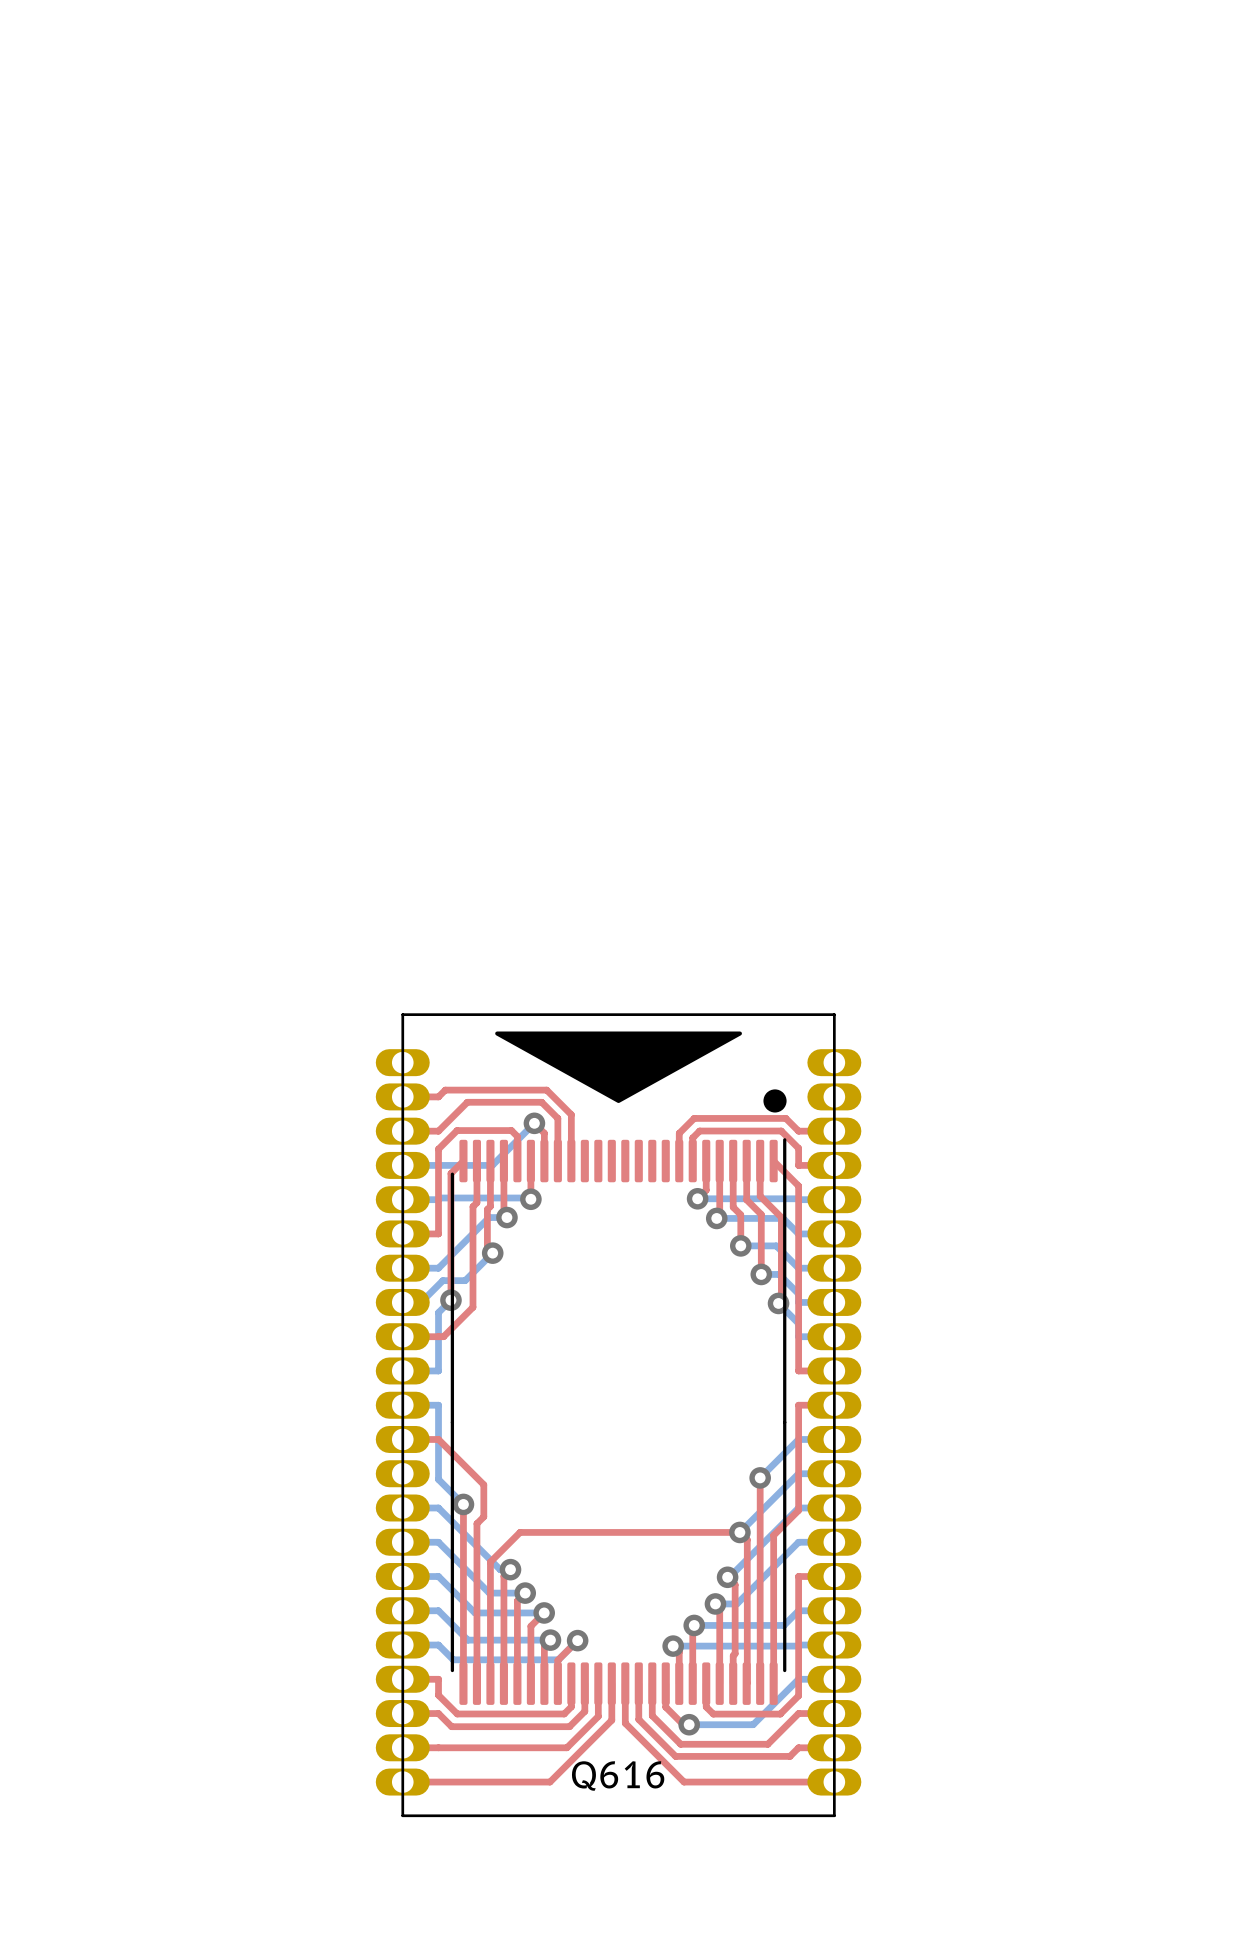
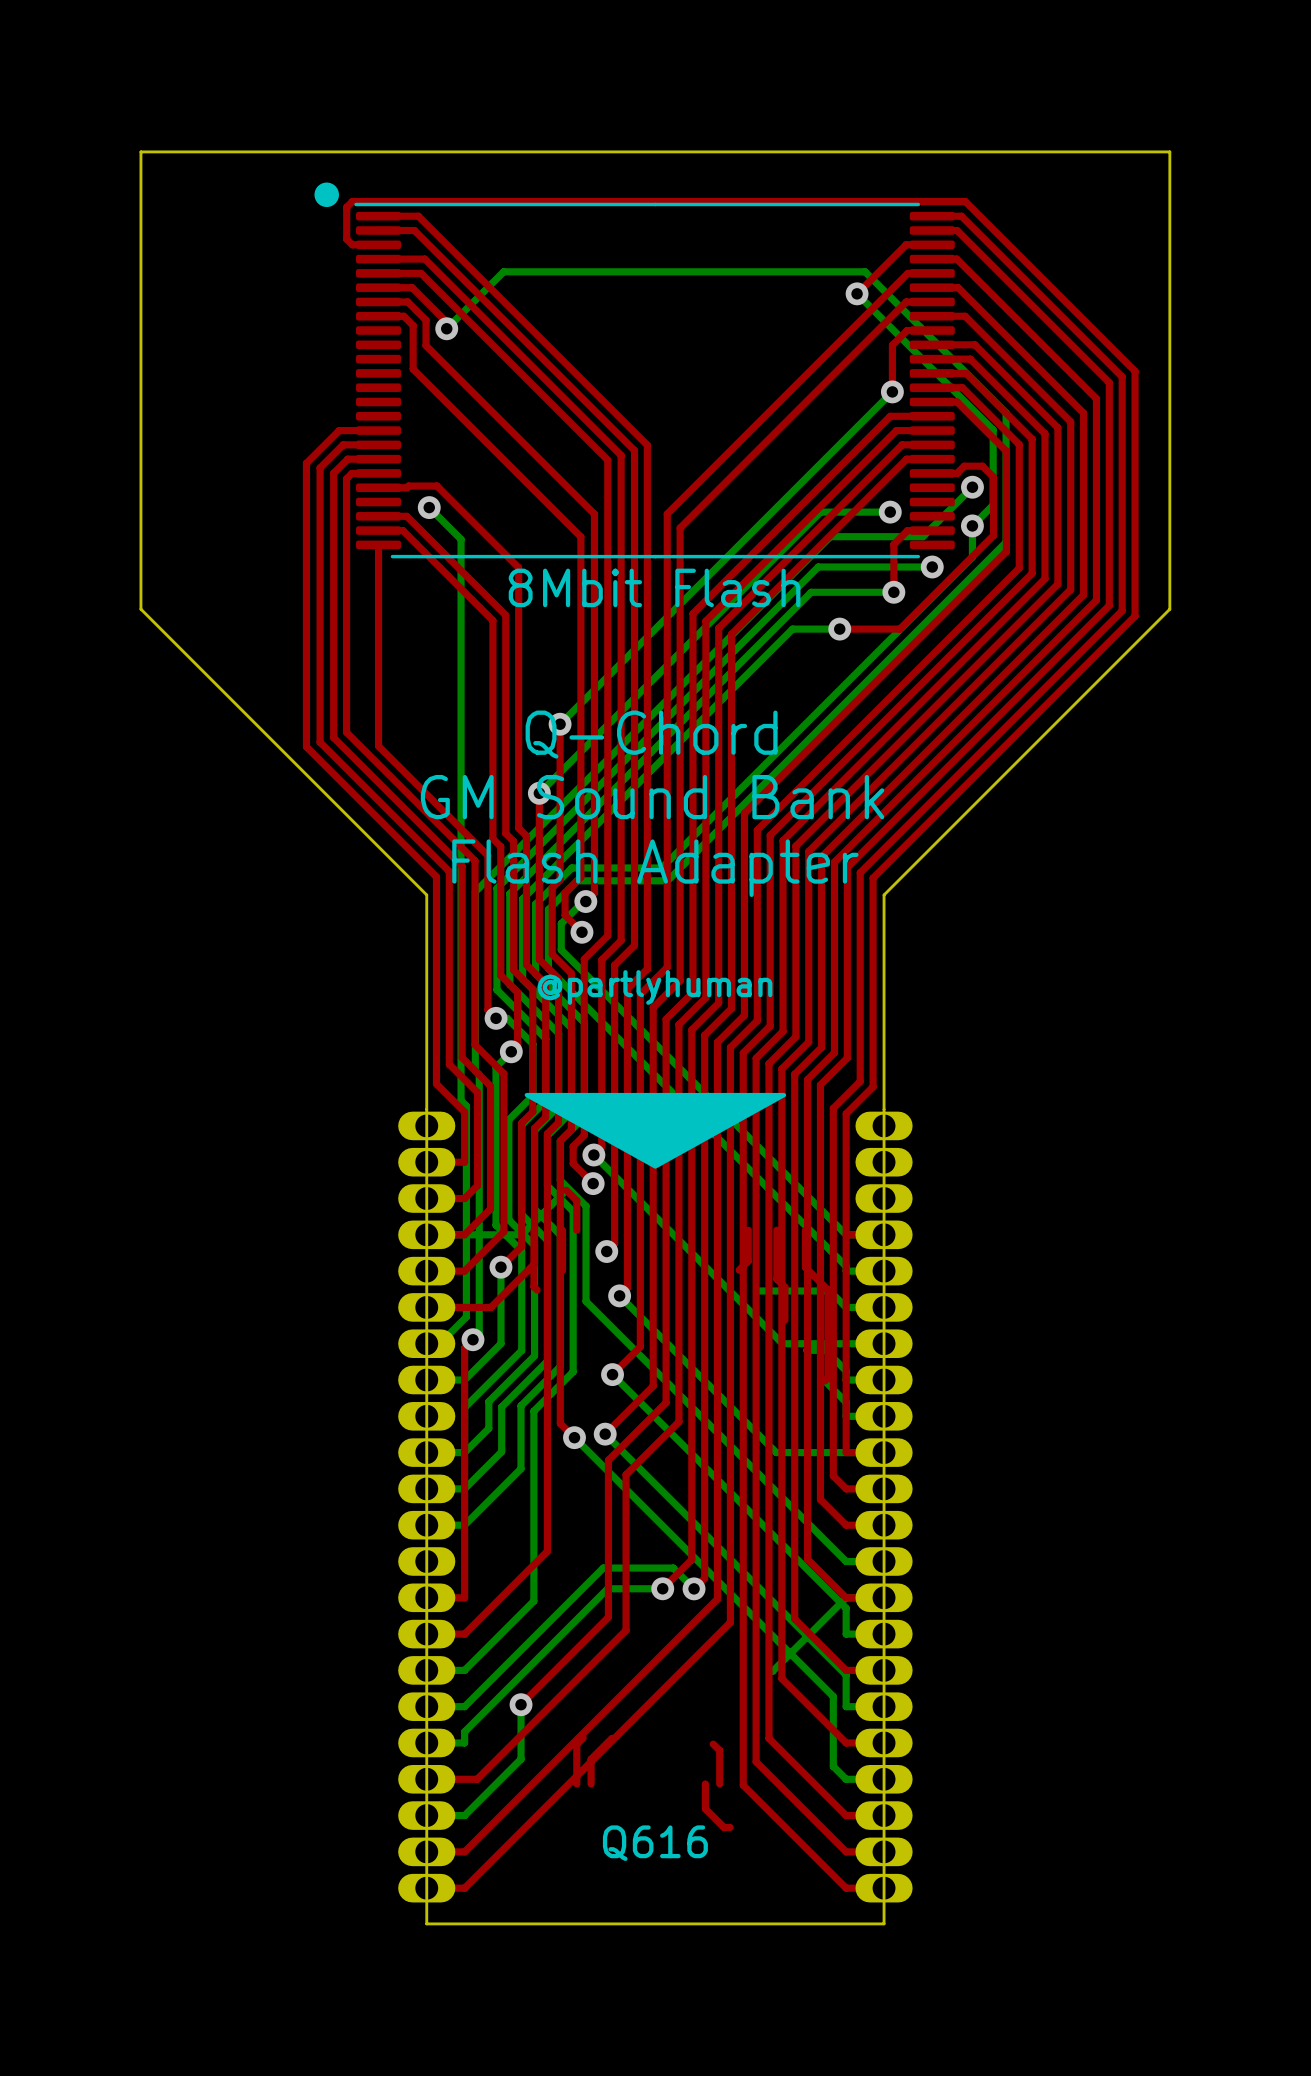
drawing: none -> [314, 182, 339, 208]
top track: none -> (378, 216) (418, 216) (647, 445) (647, 968) (627, 988) (627, 1288) (619, 1295)
top track: none -> (378, 230) (414, 230) (634, 450) (634, 945) (614, 965) (614, 1243) (606, 1251)
top track: none -> (932, 230) (957, 230) (1109, 382) (1109, 605) (847, 867) (847, 1058) (820, 1084) (820, 1499) (846, 1525) (884, 1525)
top track: none -> (932, 244) (906, 244) (857, 293)
top track: none -> (378, 259) (424, 259) (621, 455) (621, 940) (601, 959) (601, 1147) (593, 1155)
top track: none -> (932, 259) (956, 259) (1096, 398) (1096, 600) (834, 862) (834, 1052) (807, 1079) (807, 1559) (846, 1597) (884, 1597)
top track: none -> (378, 273) (421, 273) (607, 460) (607, 935) (584, 959) (584, 1135) (573, 1146) (573, 1163) (593, 1183)
top track: none -> (932, 273) (907, 273) (667, 513) (667, 967) (640, 994) (640, 1346) (612, 1374)
top track: none -> (378, 287) (412, 287) (446, 322) (446, 328)
via: none -> (857, 293)
top track: none -> (378, 301) (407, 301) (426, 320) (426, 345) (594, 514) (594, 892) (585, 901)
top track: none -> (932, 301) (906, 301) (680, 528) (680, 980) (653, 1007) (653, 1386) (605, 1434)
top track: none -> (378, 316) (403, 316) (413, 325) (413, 369) (580, 536) (580, 877) (565, 892) (565, 915) (581, 932)
top track: none -> (932, 316) (965, 316) (1070, 421) (1070, 589) (808, 851) (808, 1042) (781, 1068) (781, 1678) (846, 1742) (884, 1742)
via: none -> (446, 328)
top track: none -> (932, 330) (907, 330) (892, 345) (892, 391)
part: none -> 8Mbit Flash (654, 380)
bottom track: none -> (892, 391) (560, 724)
via: none -> (892, 391)
top track: none -> (932, 416) (890, 416) (692, 613) (692, 992) (666, 1019) (666, 1402) (608, 1460) (608, 1617) (521, 1704)
top track: none -> (932, 444) (902, 444) (718, 628) (718, 1003) (691, 1030) (691, 1559) (662, 1588)
top track: none -> (378, 459) (347, 459) (333, 473) (333, 737) (462, 866) (462, 1057) (490, 1086) (490, 1208) (464, 1234) (426, 1234)
top track: none -> (932, 459) (906, 459) (731, 634) (731, 1008) (704, 1035) (704, 1578) (694, 1588)
top track: none -> (378, 473) (351, 473) (346, 478) (346, 732) (475, 860) (475, 1044) (503, 1073) (503, 1231) (464, 1271) (426, 1271)
top track: none -> (932, 473) (956, 473) (964, 466) (982, 466) (993, 477) (993, 535) (899, 629) (839, 629)
bottom track: none -> (972, 487) (923, 536) (830, 536) (475, 891) (475, 1070) (479, 1074) (479, 1333) (472, 1339)
via: none -> (972, 487)
via: none -> (429, 507)
bottom track: none -> (890, 512) (820, 512) (539, 793)
via: none -> (890, 512)
top track: none -> (378, 516) (406, 516) (505, 615) (505, 833) (513, 841) (513, 970) (532, 989) (532, 1111) (521, 1123) (521, 1246) (500, 1267)
via: none -> (972, 525)
top track: none -> (378, 530) (402, 530) (492, 620) (492, 838) (500, 846) (500, 975) (517, 992) (517, 1045) (511, 1051)
top track: none -> (932, 530) (907, 530) (893, 544) (893, 592)
top track: none -> (378, 544) (378, 746) (487, 855) (487, 1010) (496, 1018)
via: none -> (932, 567)
bottom track: none -> (893, 592) (811, 592) (509, 893) (509, 984) (558, 1033) (558, 1106) (534, 1130) (534, 1209) (560, 1234) (560, 1366) (520, 1405) (520, 1468) (464, 1525) (426, 1525)
via: none -> (893, 592)
via: none -> (839, 629)
top track: none -> (560, 724) (560, 879) (552, 887) (552, 954) (571, 973) (571, 1130) (560, 1141) (560, 1423) (574, 1437)
via: none -> (560, 724)
text: none -> Q-Chord (651, 734)
top track: none -> (539, 793) (539, 959) (558, 978) (558, 1122) (547, 1133) (547, 1551) (464, 1634) (426, 1634)
via: none -> (539, 793)
text: none -> GM Sound Bank (652, 797)
text: none -> Flash Adapter (655, 868)
bottom track: none -> (585, 901) (583, 901) (561, 923) (561, 949) (846, 1234) (884, 1234)
via: none -> (585, 901)
via: none -> (581, 932)
text: none -> @partlyhuman (654, 987)
bottom track: none -> (496, 1018) (507, 1018) (532, 1044) (532, 1095) (508, 1119) (508, 1219) (534, 1245) (534, 1355) (488, 1401) (488, 1428) (464, 1452)
via: none -> (496, 1018)
via: none -> (511, 1051)
board edge: (402, 1014) (834, 1014) -> (426, 1075) (426, 895) (140, 609) (140, 151) (1169, 151) (1169, 609) (884, 895) (884, 1075)
drawing: [763, 1089, 787, 1113] -> none
via: none -> (593, 1155)
top track: (438, 1096) (445, 1090) (546, 1090) (571, 1114) (571, 1161) -> (464, 1162) (464, 1112) (436, 1083) (436, 876) (306, 746) (306, 463) (339, 430) (378, 430)
via: none -> (593, 1183)
top track: (450, 1118) (467, 1102) (541, 1102) (557, 1118) (557, 1161) -> (477, 1185) (477, 1092) (449, 1064) (449, 871) (320, 742) (320, 467) (343, 444) (378, 444)
via: (534, 1123) -> none
top track: (834, 1131) (798, 1131) (785, 1118) (694, 1118) (679, 1133) (679, 1161) -> none
top track: (798, 1148) (781, 1131) (699, 1131) (692, 1137) (692, 1161) -> (846, 1216) (846, 1113) (873, 1086) (873, 878) (1135, 616) (1135, 371) (965, 201) (352, 201) (346, 207) (346, 239) (352, 244) (378, 244)
top track: (463, 1161) (450, 1173) (450, 1300) -> none
top track: (476, 1161) (476, 1202) (472, 1206) (472, 1307) (443, 1336) (402, 1336) -> none
top track: (490, 1161) (490, 1206) (487, 1209) (487, 1247) (492, 1253) -> none
top track: (517, 1161) (517, 1136) (511, 1130) (457, 1130) (438, 1149) (438, 1233) -> (378, 487) (437, 486) (518, 567) (518, 828) (526, 836) (526, 964) (545, 984) (545, 1117) (534, 1128) (534, 1263) (490, 1307) (464, 1307)
top track: (719, 1161) (719, 1215) (716, 1218) -> none
top track: (746, 1161) (746, 1199) (761, 1214) (761, 1274) -> none
top track: (773, 1161) (798, 1185) -> (846, 1234) (846, 1256)
via: none -> (606, 1251)
via: none -> (500, 1267)
bottom track: (697, 1198) (798, 1199) -> (446, 328) (503, 271) (865, 271) (1006, 412) (1006, 542) (667, 880) (577, 880) (548, 909) (548, 968) (846, 1266) (846, 1271)
via: (697, 1198) -> none
bottom track: (530, 1199) (440, 1197) (438, 1199) (402, 1199) -> none
via: (530, 1199) -> none
bottom track: (506, 1217) (489, 1217) (438, 1268) (414, 1268) -> (429, 507) (461, 539) (461, 1100) (466, 1105) (466, 1317) (439, 1343)
via: (506, 1217) -> none
via: (716, 1218) -> none
bottom track: none -> (619, 1295) (776, 1452) (884, 1452)
via: none -> (619, 1295)
bottom track: (740, 1245) (776, 1245) (798, 1268) -> (593, 1155) (782, 1343) (846, 1343)
via: (740, 1245) -> none
bottom track: (492, 1253) (465, 1280) (442, 1280) (421, 1302) -> (500, 1267) (500, 1343) (464, 1380) (446, 1380)
via: (492, 1253) -> none
top track: none -> (472, 1339) (464, 1348) (464, 1597) (426, 1597)
via: none -> (472, 1339)
via: (761, 1274) -> none
via: none -> (612, 1374)
bottom track: (450, 1300) (438, 1312) (438, 1328) -> (511, 1051) (495, 1067) (495, 1225) (521, 1250) (521, 1350) (464, 1407)
via: (450, 1300) -> none
via: (778, 1303) -> none
via: none -> (605, 1434)
via: none -> (574, 1437)
bottom track: (438, 1405) (438, 1479) (463, 1504) -> (464, 1488) (501, 1451) (501, 1406) (547, 1361) (547, 1240) (521, 1214) (521, 1125) (545, 1101) (545, 1038) (496, 989) (496, 888) (818, 567) (932, 567)
top track: (798, 1405) (798, 1510) (773, 1535) (773, 1683) -> (846, 1488) (833, 1476) (833, 1108) (860, 1081) (860, 872) (1122, 610) (1122, 376) (961, 216) (932, 216)
part: (618, 1421) -> none
top track: (402, 1439) (438, 1439) (483, 1484) (483, 1516) (476, 1523) (476, 1683) -> none
bottom track: (834, 1439) (798, 1439) (760, 1477) -> none
bottom track: (798, 1473) (739, 1532) -> (846, 1561) (586, 1301) (586, 1206) (560, 1180) (560, 1141) (584, 1116) (584, 1022) (535, 973) (535, 904) (571, 867) (661, 867) (972, 557) (972, 525) (993, 505) (993, 429) (857, 293)
top track: (760, 1477) (760, 1683) -> none
via: (760, 1477) -> none
via: none -> (662, 1588)
via: none -> (694, 1588)
top track: (463, 1504) (463, 1683) -> none
via: (463, 1504) -> none
bottom track: (402, 1507) (438, 1507) (500, 1569) (510, 1569) -> none
via: (739, 1532) -> none
bottom track: (402, 1542) (438, 1542) (489, 1593) (525, 1593) -> none
bottom track: (798, 1542) (736, 1603) (715, 1603) -> (846, 1634) (846, 1608) (612, 1374)
top track: (510, 1569) (503, 1576) (503, 1683) -> none
via: (510, 1569) -> none
bottom track: (438, 1576) (474, 1612) (544, 1612) -> (464, 1670) (533, 1601) (533, 1411) (573, 1371) (573, 1211) (547, 1185) (547, 1135) (571, 1111) (571, 1028) (522, 979) (522, 899) (792, 629) (839, 629)
top track: (798, 1576) (798, 1695) (780, 1714) (713, 1714) (706, 1706) (706, 1683) -> (846, 1670) (794, 1618) (794, 1074) (821, 1047) (821, 856) (1083, 594) (1083, 413) (958, 287) (932, 287)
top track: (727, 1577) (735, 1584) (733, 1683) -> none
via: (727, 1577) -> none
top track: (525, 1593) (517, 1600) (517, 1683) -> none
via: (525, 1593) -> none
top track: (715, 1603) (719, 1608) (719, 1683) -> none
via: (715, 1603) -> none
bottom track: none -> (521, 1704) (521, 1759) (464, 1815) (426, 1815)
via: none -> (521, 1704)
bottom track: (438, 1610) (467, 1640) (550, 1640) -> (464, 1706) (603, 1568) (673, 1568) (694, 1588)
bottom track: (798, 1610) (783, 1625) (694, 1625) -> (846, 1706) (846, 1675) (605, 1434)
top track: (544, 1612) (530, 1626) (530, 1683) -> none
via: (544, 1612) -> none
top track: (694, 1625) (692, 1683) -> none
via: (694, 1625) -> none
via: (550, 1640) -> none
bottom track: (577, 1640) (558, 1659) (453, 1659) (438, 1645) -> (662, 1588) (607, 1588) (464, 1731) (464, 1742)
via: (577, 1640) -> none
bottom track: (834, 1645) (673, 1646) -> none
via: (673, 1646) -> none
top track: (438, 1679) (438, 1695) (457, 1713) (564, 1713) (571, 1706) (571, 1683) -> (464, 1779) (477, 1779) (626, 1630) (626, 1474) (678, 1421) (678, 1024) (705, 997) (705, 621) (896, 430) (932, 430)
bottom track: (798, 1679) (753, 1724) (689, 1724) -> (846, 1779) (833, 1766) (833, 1696) (574, 1437)
top track: (490, 1683) (490, 1562) (520, 1532) (739, 1532) (747, 1539) (746, 1683) -> none
top track: (584, 1683) (584, 1711) (569, 1726) (451, 1726) (438, 1713) (402, 1713) -> none
top track: (598, 1683) (598, 1716) (566, 1747) (438, 1747) -> (932, 401) (957, 401) (1006, 451) (1006, 551) (744, 813) (744, 1015) (717, 1042) (717, 1598) (464, 1851)
top track: (611, 1683) (611, 1720) (550, 1782) (438, 1782) -> (932, 387) (962, 387) (1019, 444) (1019, 568) (757, 830) (757, 1020) (730, 1047) (730, 1622) (464, 1888)
top track: (625, 1683) (625, 1723) (684, 1782) (798, 1782) -> (932, 373) (966, 373) (1032, 439) (1032, 573) (770, 835) (770, 1026) (743, 1052) (743, 1785) (846, 1888)
top track: (638, 1683) (638, 1719) (675, 1756) (789, 1756) (798, 1747) -> (932, 359) (970, 359) (1045, 433) (1045, 578) (783, 840) (783, 1031) (756, 1058) (756, 1761) (846, 1851)
top track: (652, 1683) (652, 1715) (680, 1744) (767, 1744) (798, 1713) -> (932, 344) (974, 344) (1057, 427) (1057, 584) (795, 846) (795, 1036) (768, 1063) (768, 1738) (846, 1815)
via: (689, 1724) -> none
text position: Q616 (618, 1775) -> Q616 (655, 1843)

